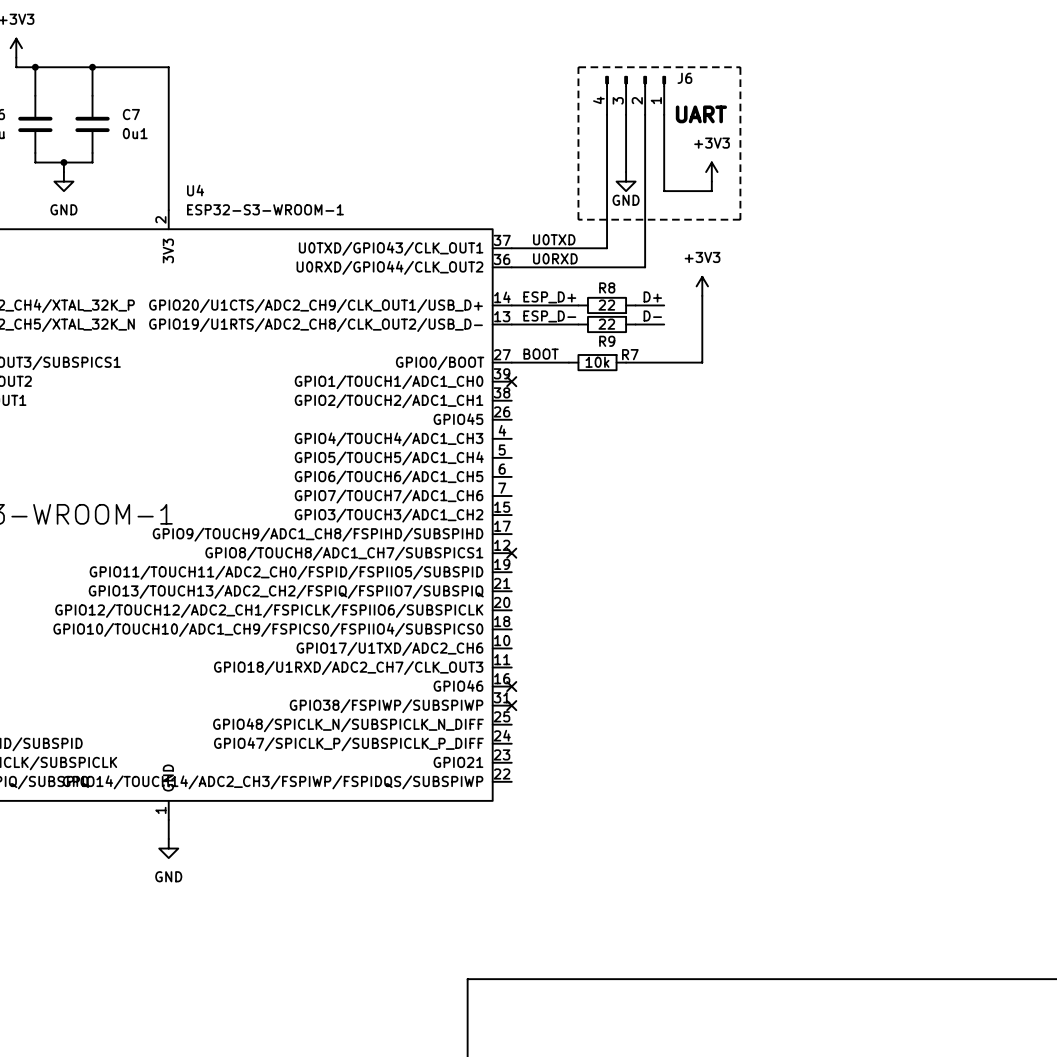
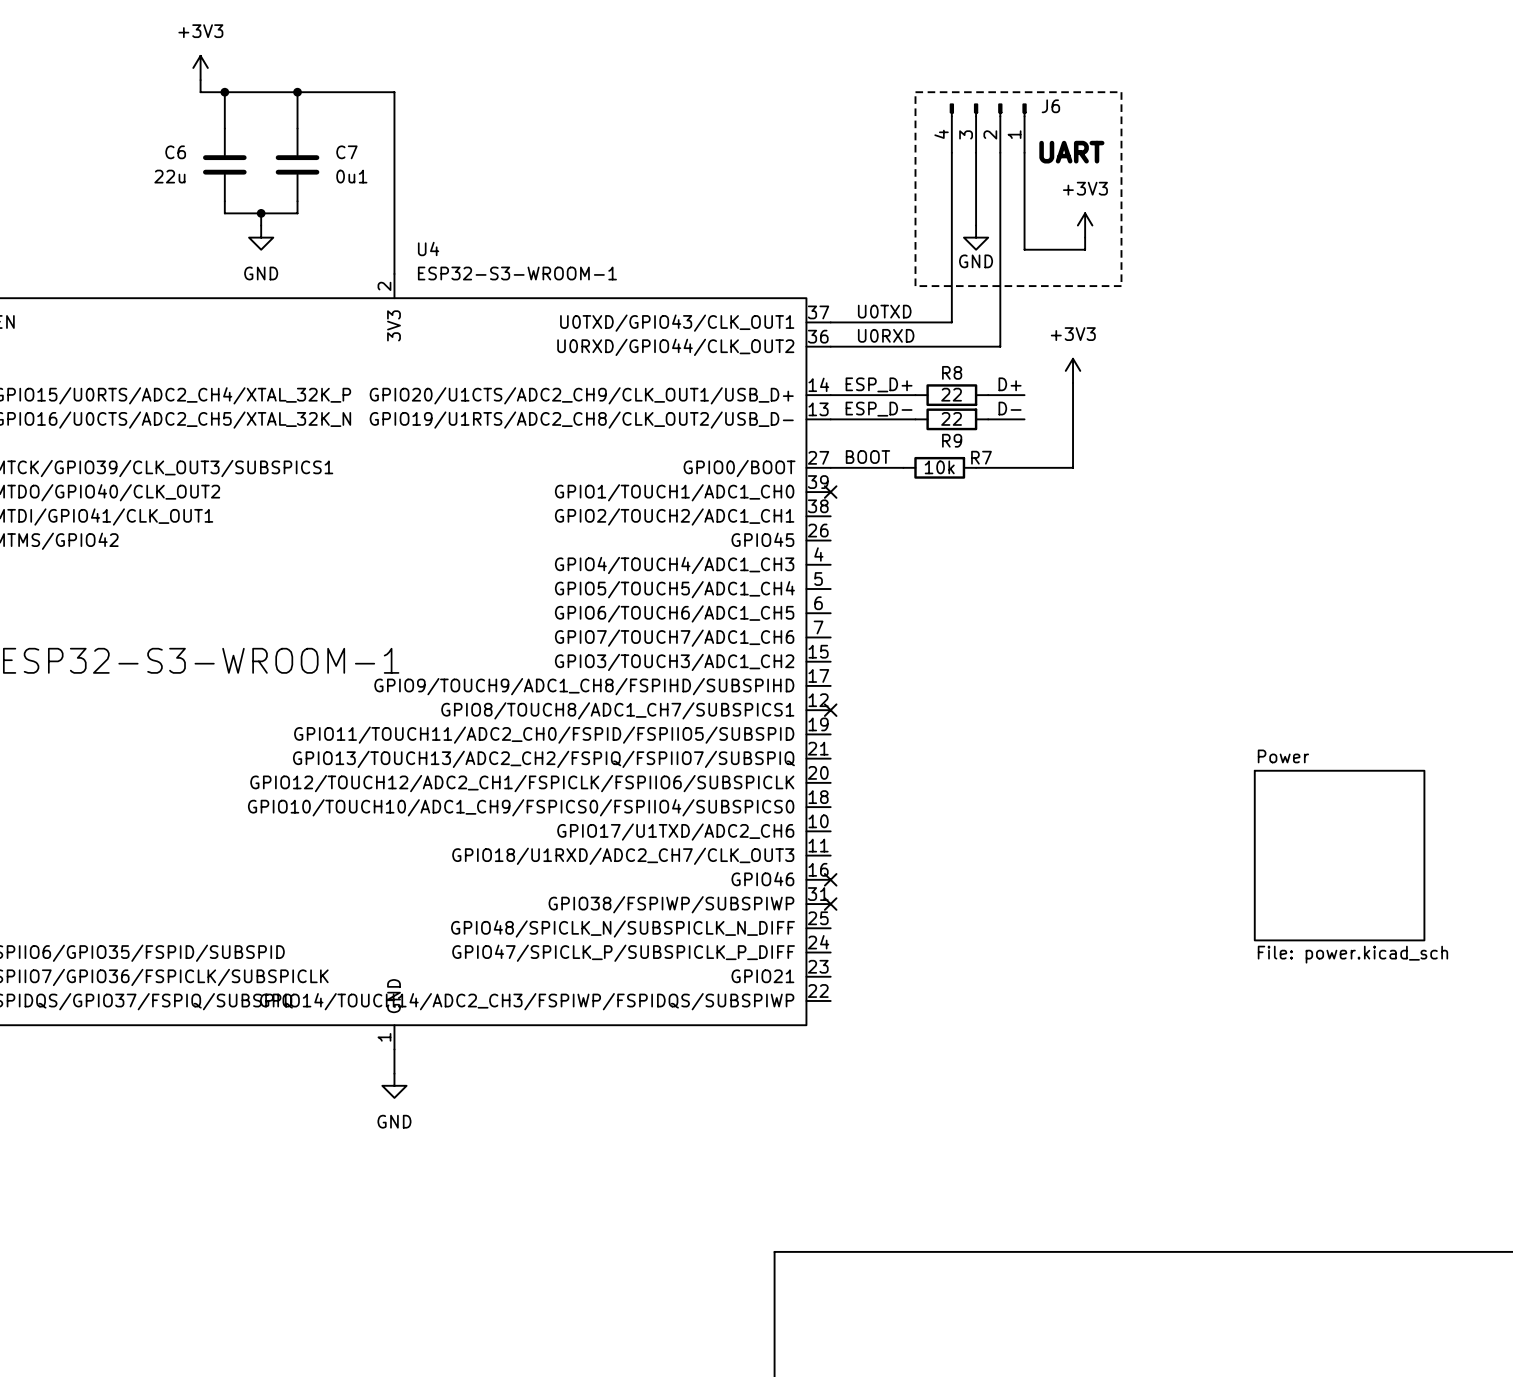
sheet Power: none -> File: power.kicad_sch (1339, 855)

